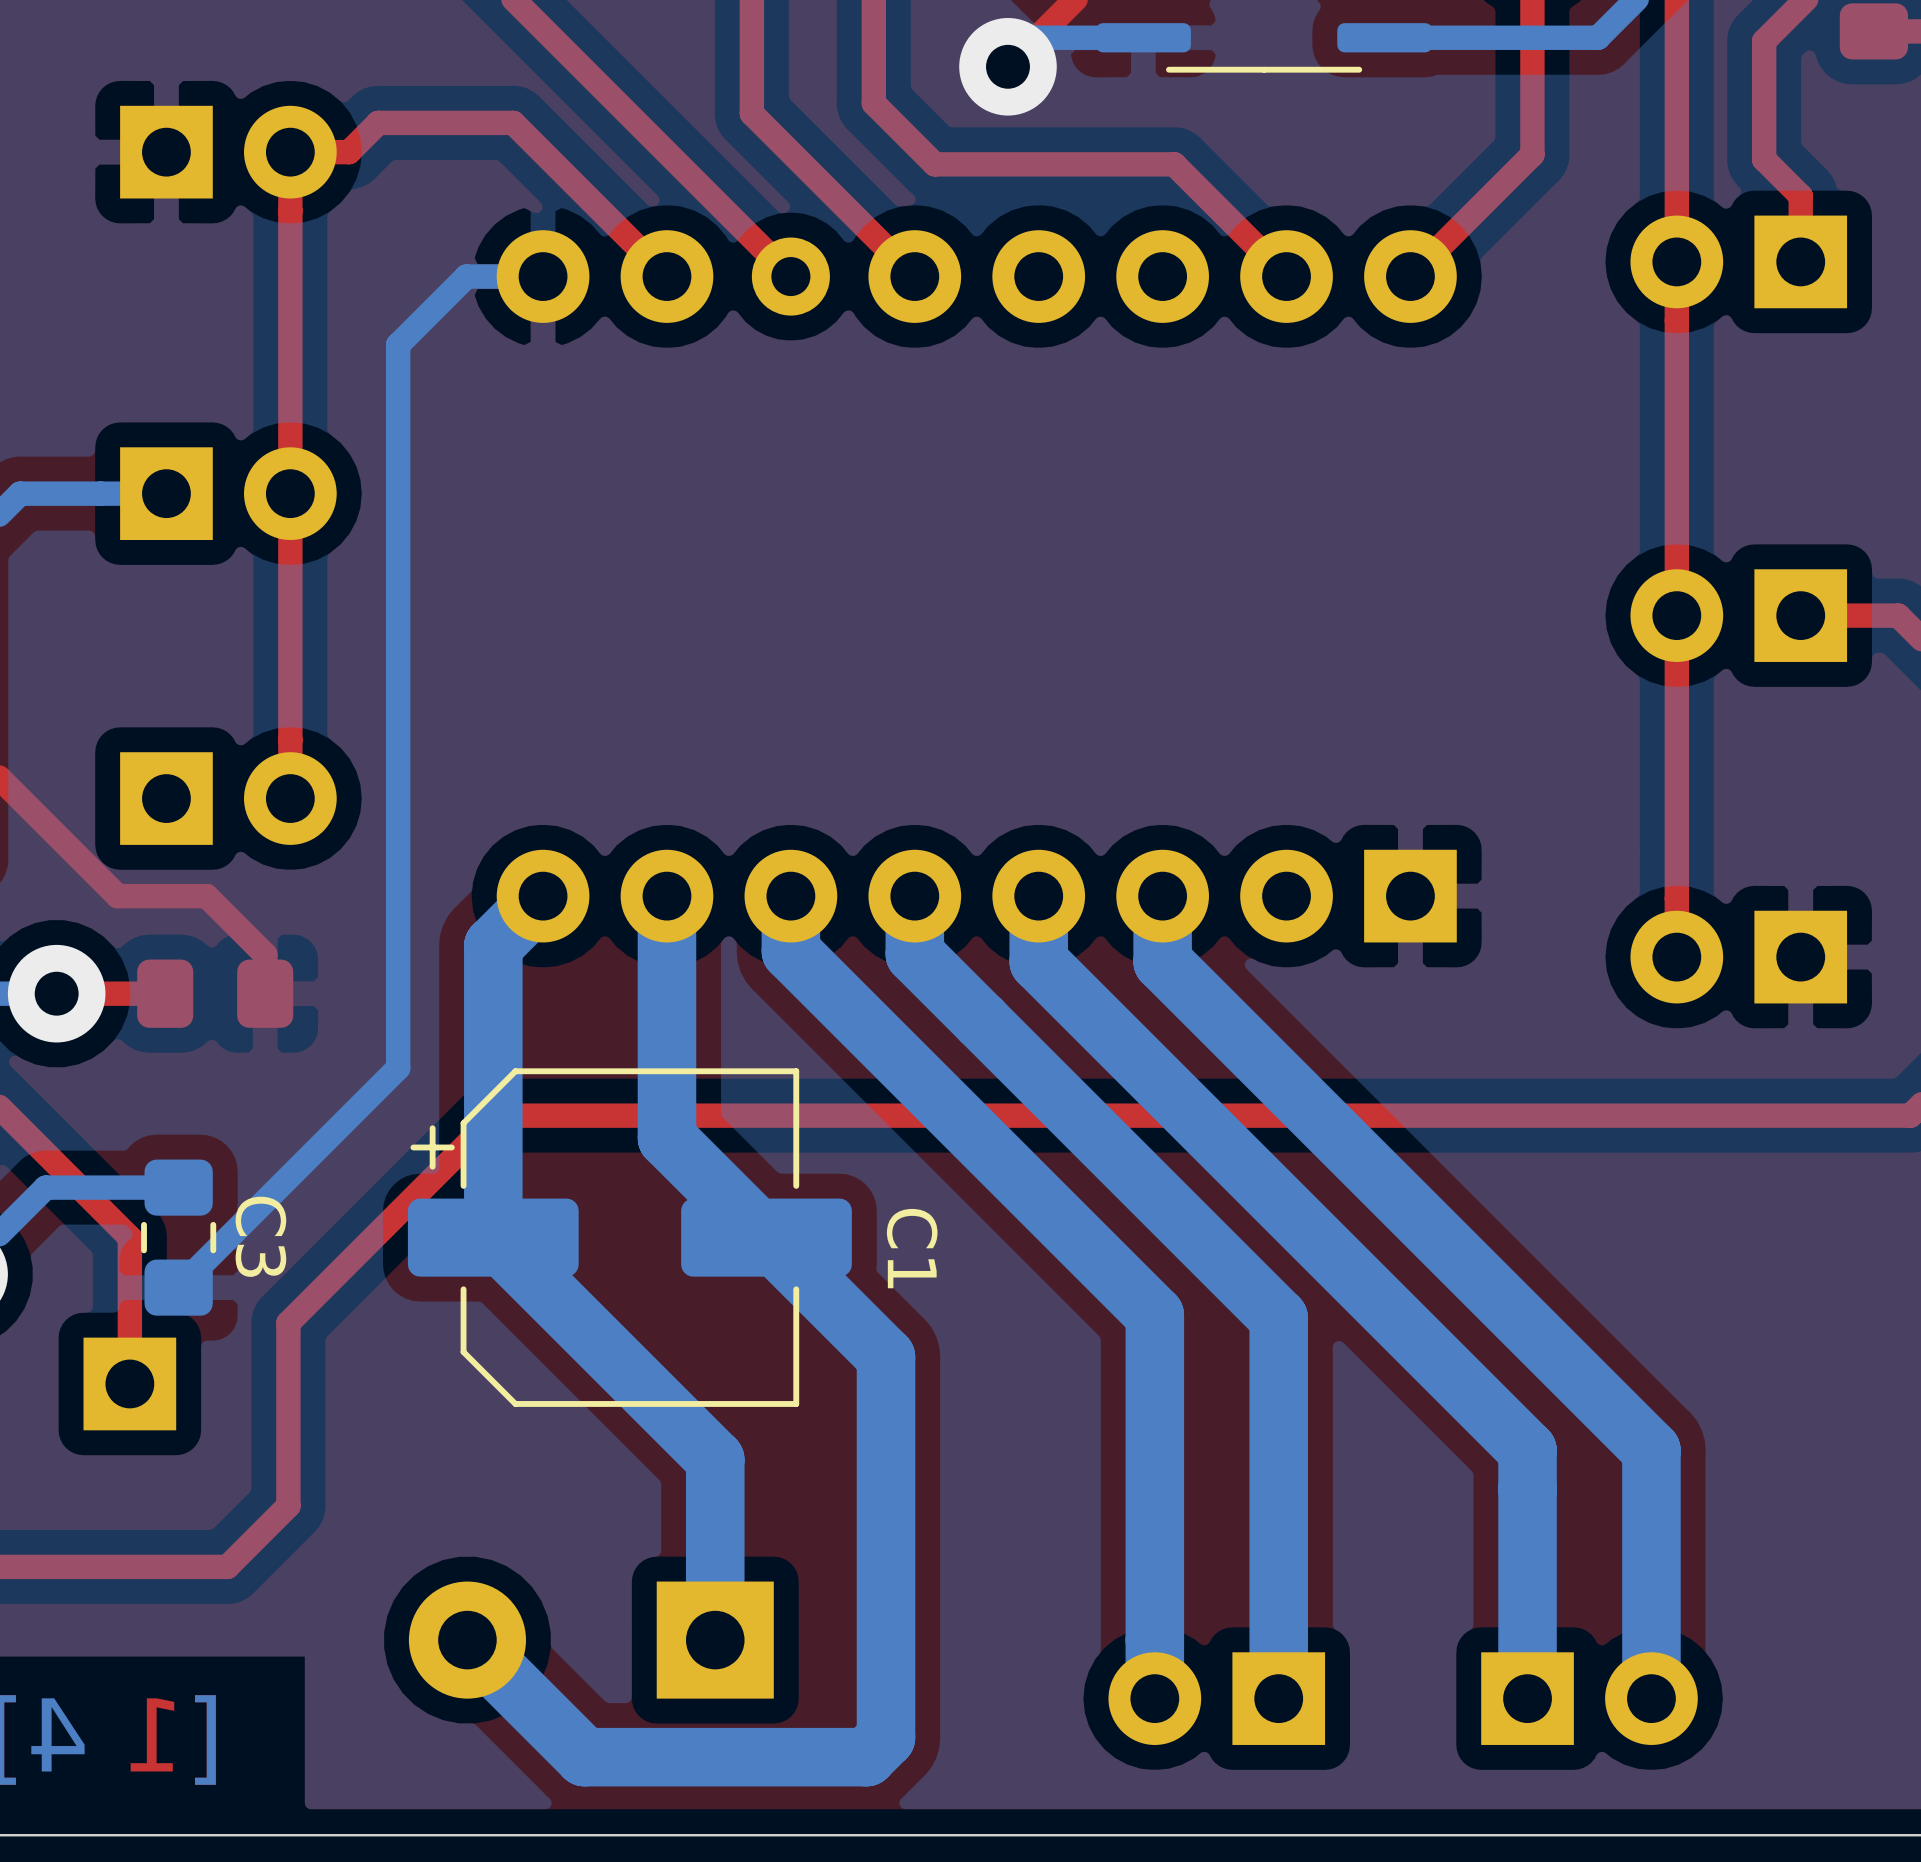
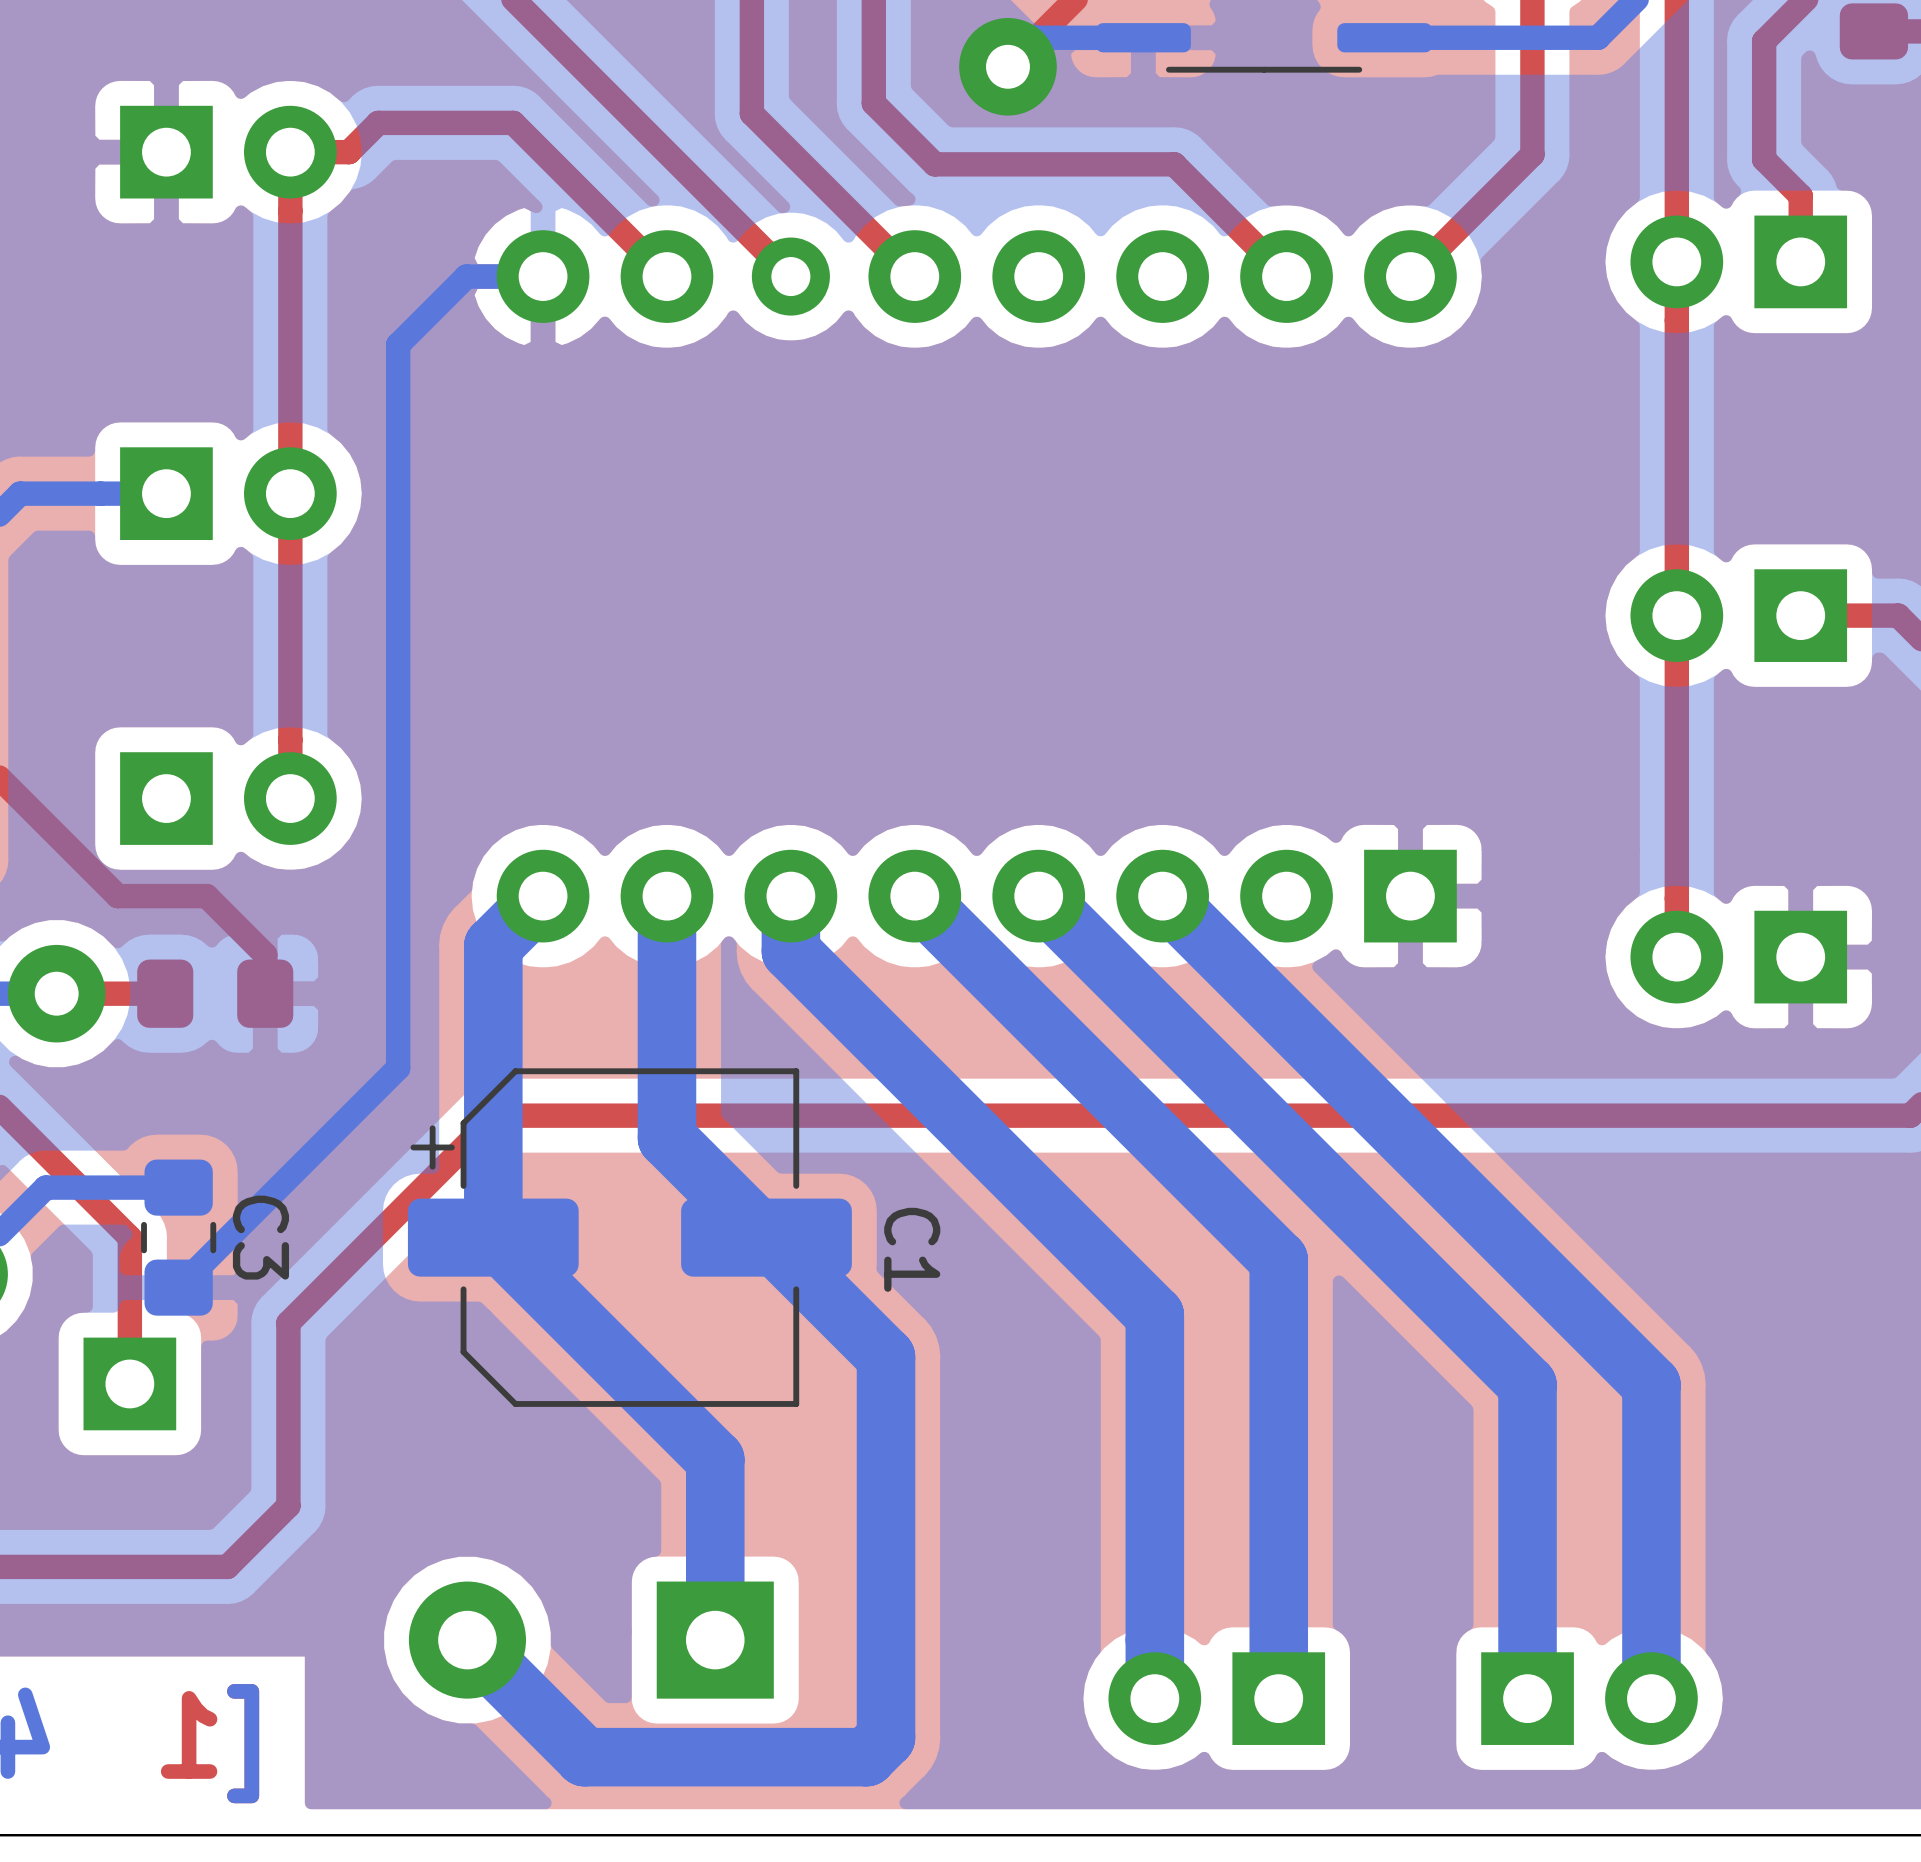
bottom track: (914, 896) (914, 954) (1278, 1318) -> (914, 896) (1278, 1260) (1278, 1318)
bottom track: (1038, 896) (1038, 961) (1527, 1450) -> (1038, 896) (1527, 1384) (1527, 1450)
bottom track: (1162, 896) (1162, 961) (1651, 1450) -> (1162, 896) (1651, 1384) (1651, 1450)

